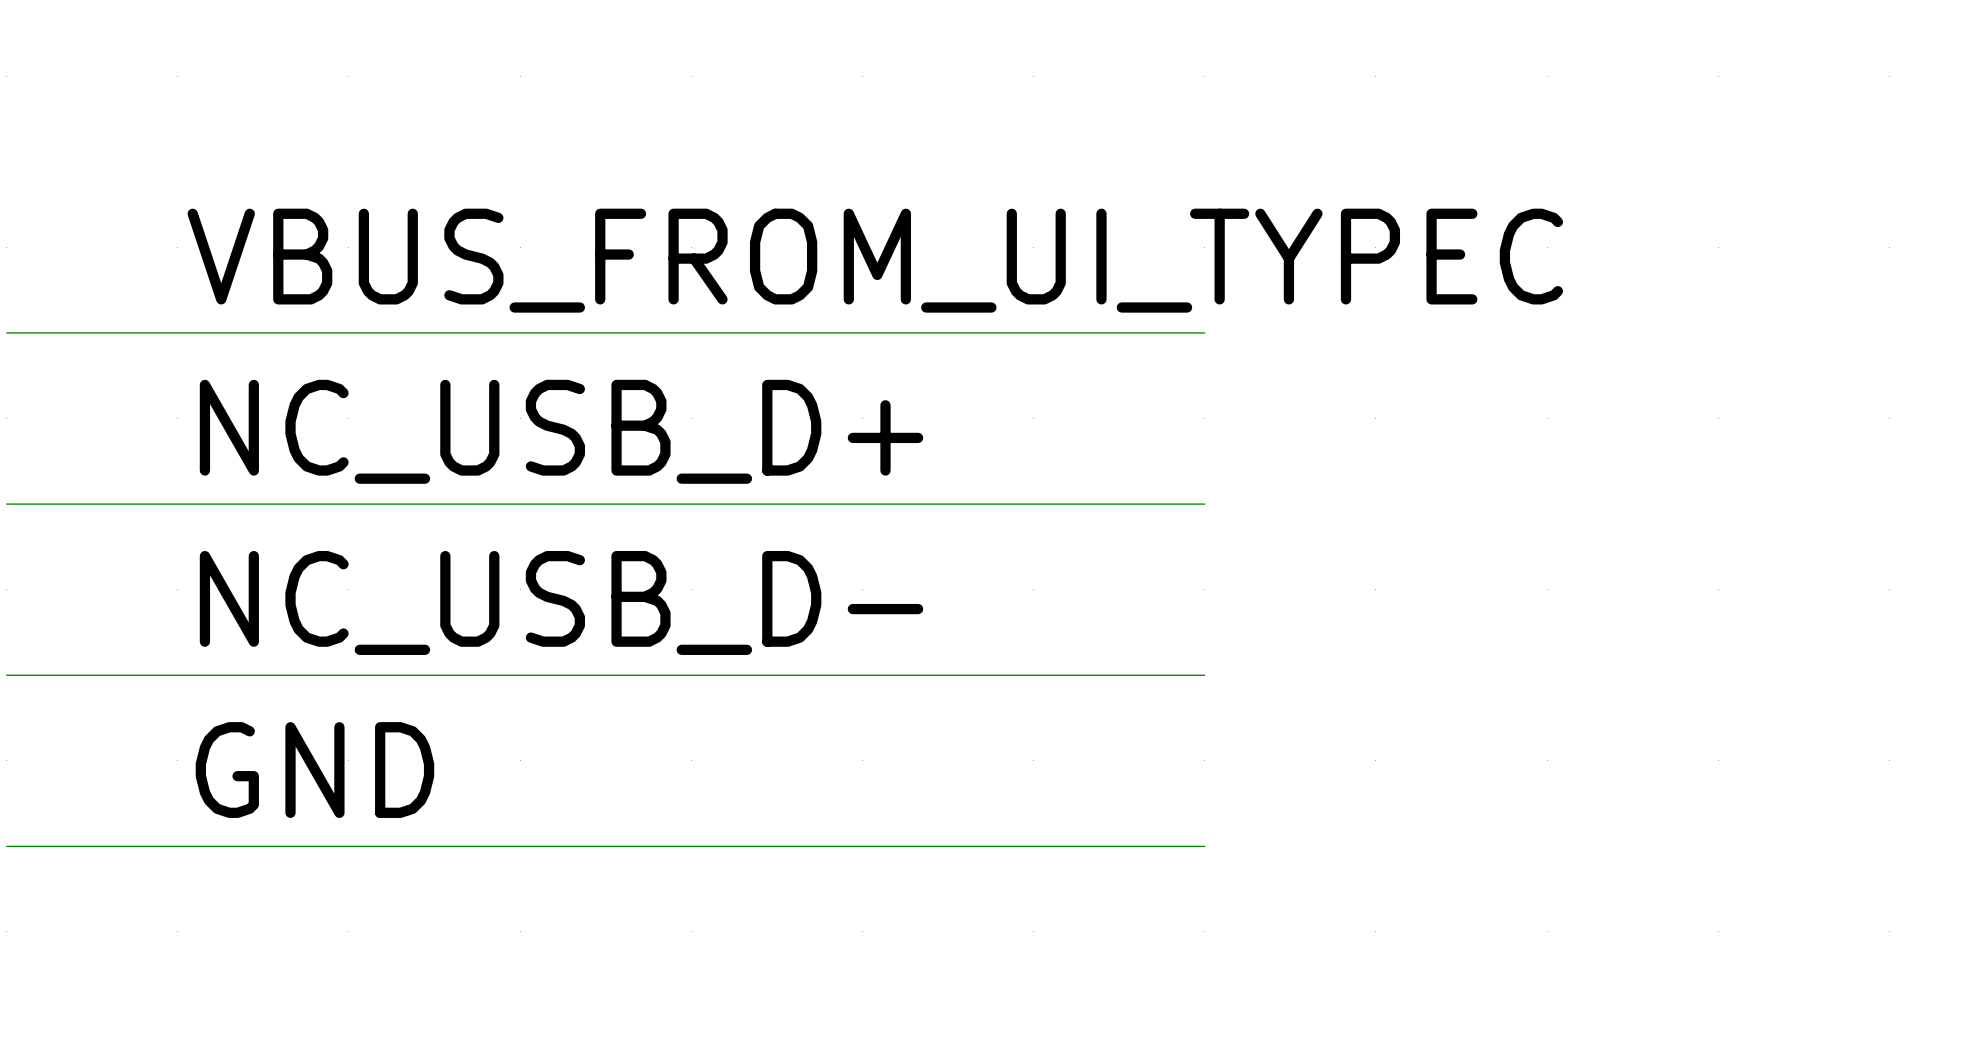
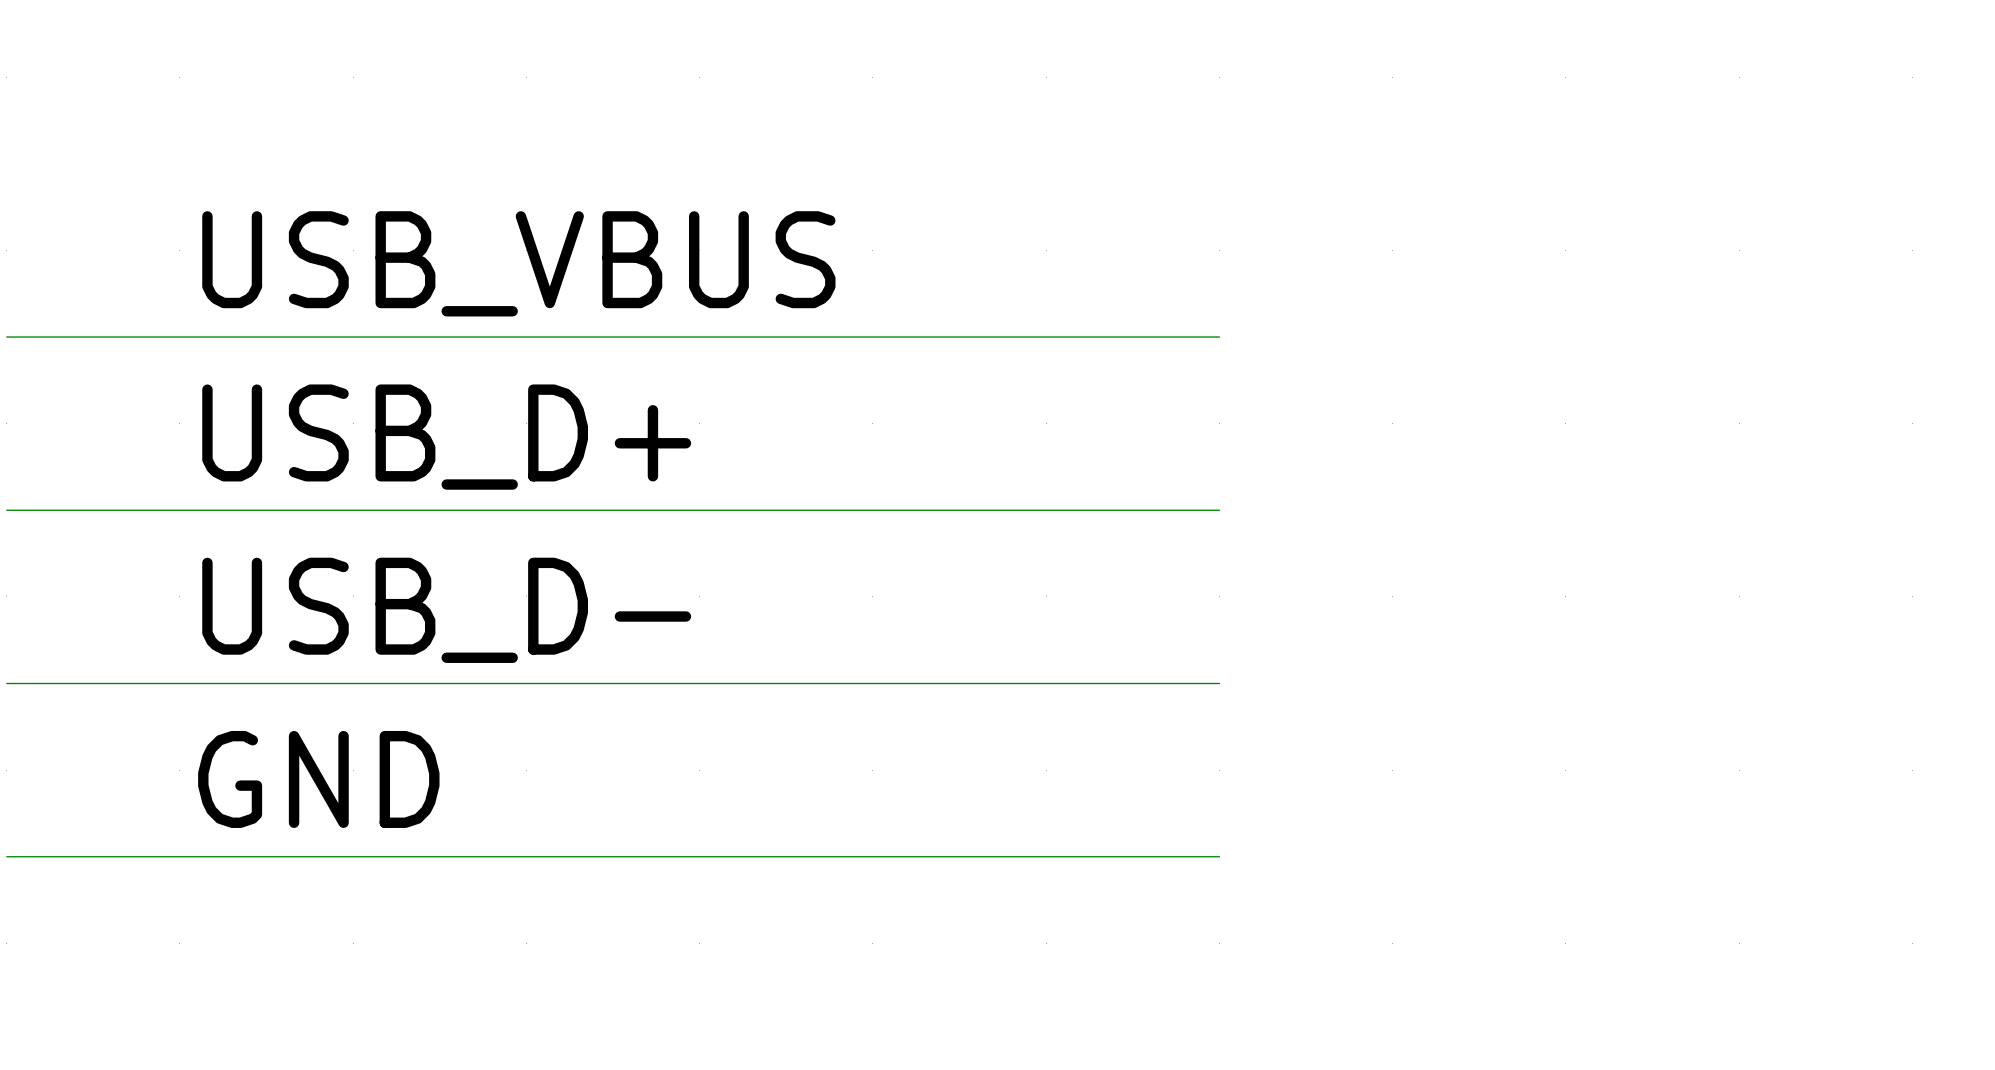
label: VBUS_FROM_UI_TYPEC (875, 260) -> USB_VBUS (518, 263)
label: NC_USB_D+ (561, 431) -> USB_D+ (446, 437)
label: NC_USB_D- (561, 602) -> USB_D- (446, 610)

